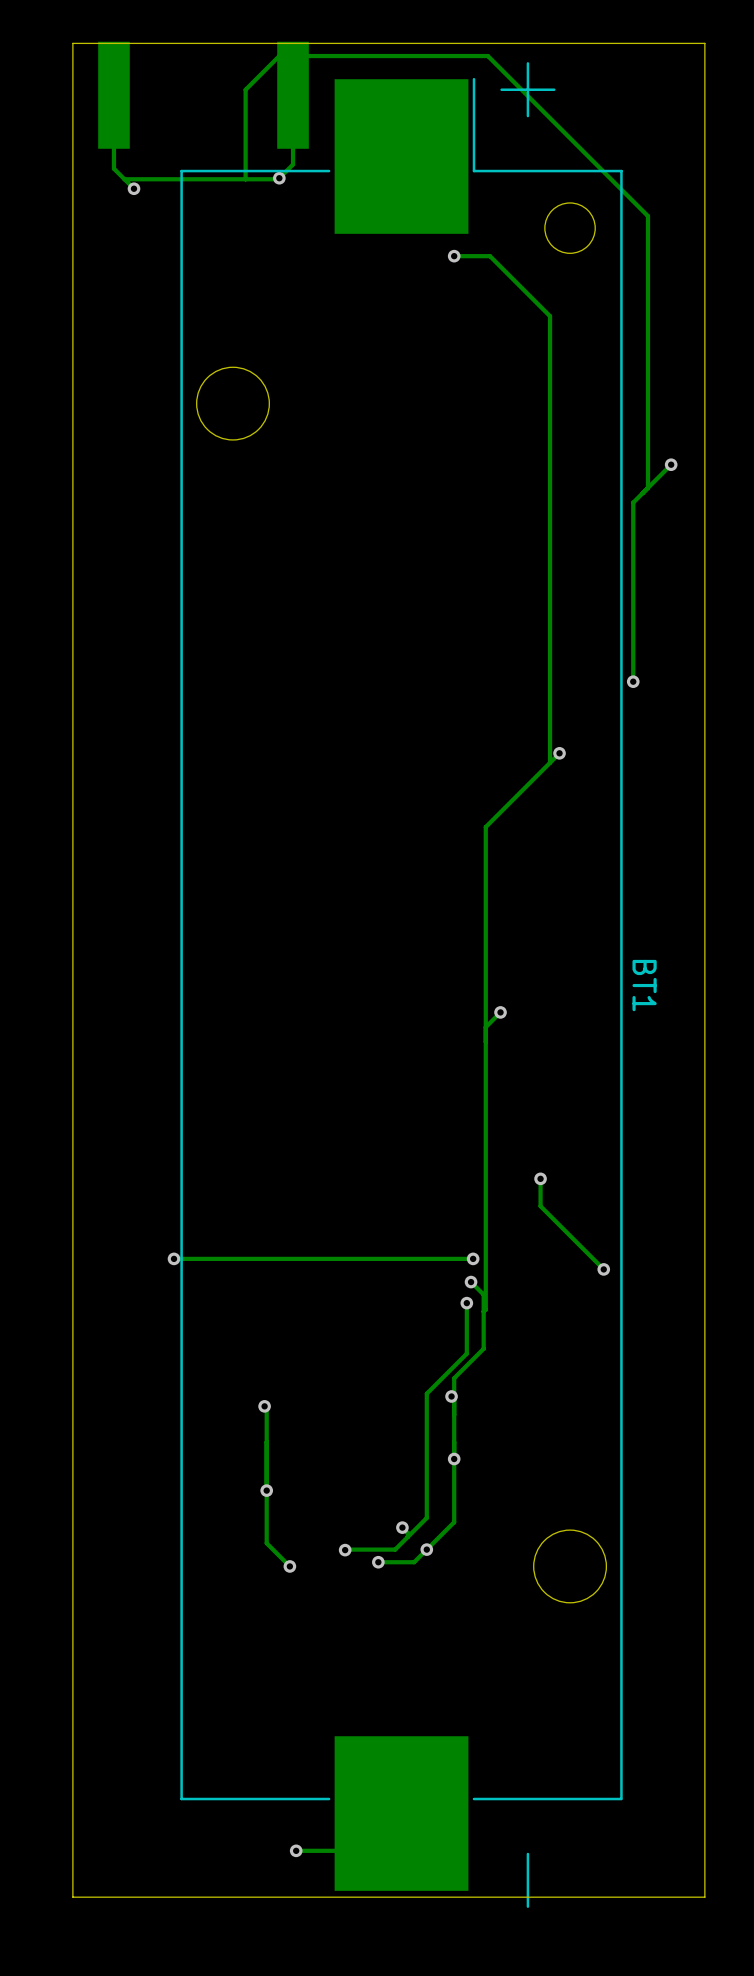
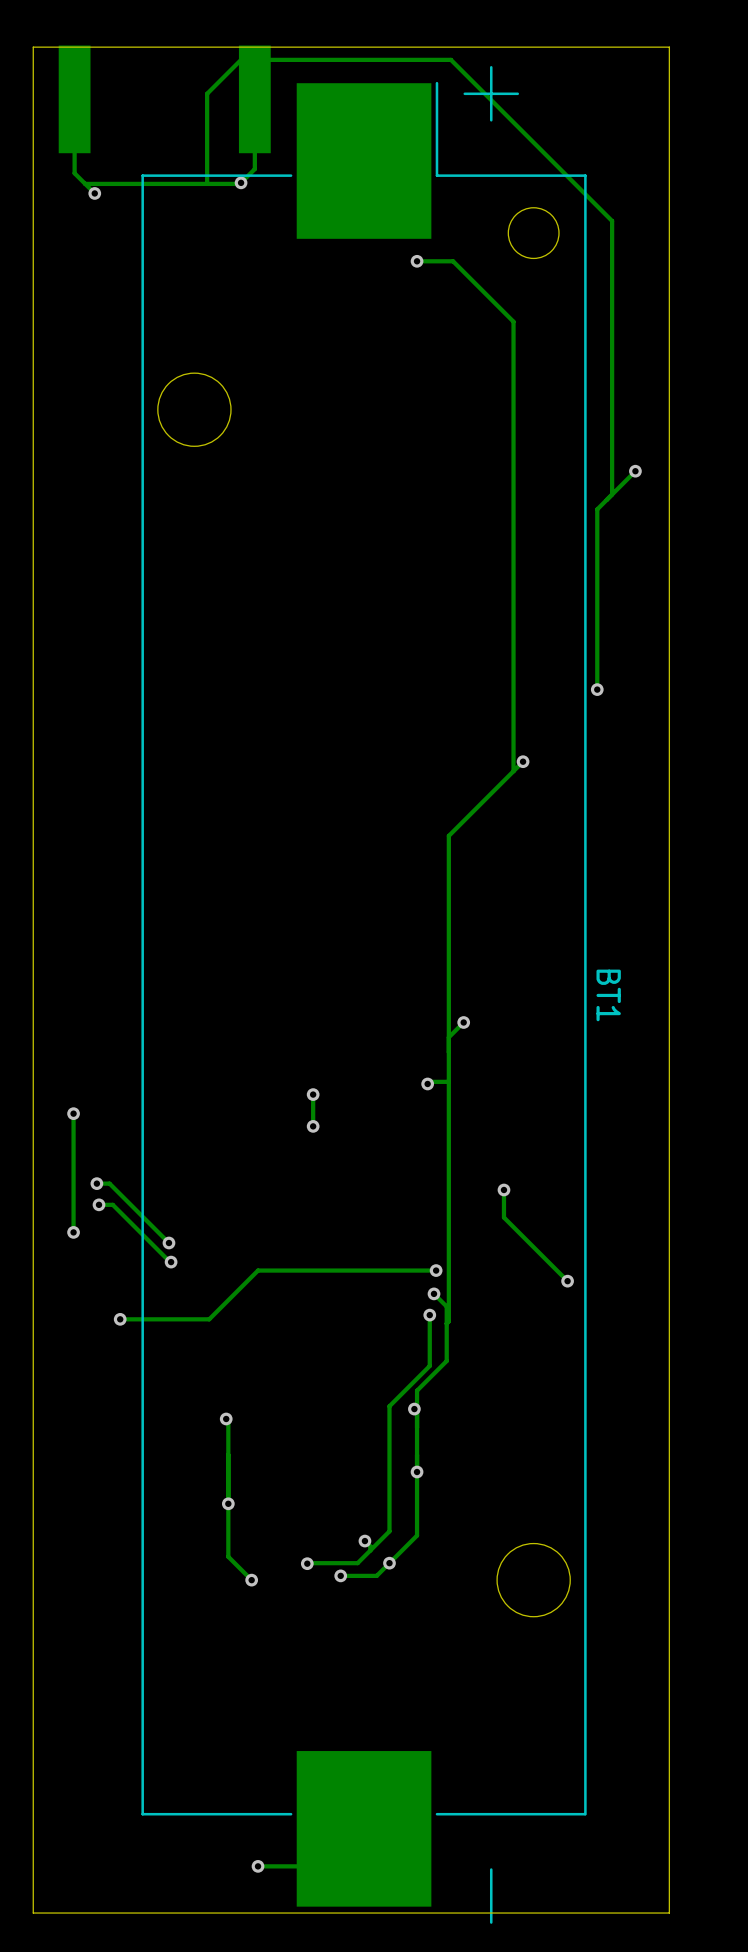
track: none -> (448, 1081) (429, 1081) (427, 1083)
via: none -> (427, 1083)
track: none -> (313, 1094) (313, 1126)
via: none -> (313, 1094)
track: none -> (73, 1113) (73, 1232)
via: none -> (73, 1113)
via: none -> (313, 1126)
track: none -> (96, 1183) (109, 1183) (168, 1243)
via: none -> (96, 1183)
track: none -> (99, 1204) (112, 1204) (171, 1262)
via: none -> (99, 1204)
via: none -> (73, 1232)
via: none -> (168, 1243)
via: none -> (171, 1262)
via: (174, 1258) -> none
track: (296, 1258) (174, 1258) -> (258, 1270) (209, 1319) (120, 1319)
via: none -> (120, 1319)

